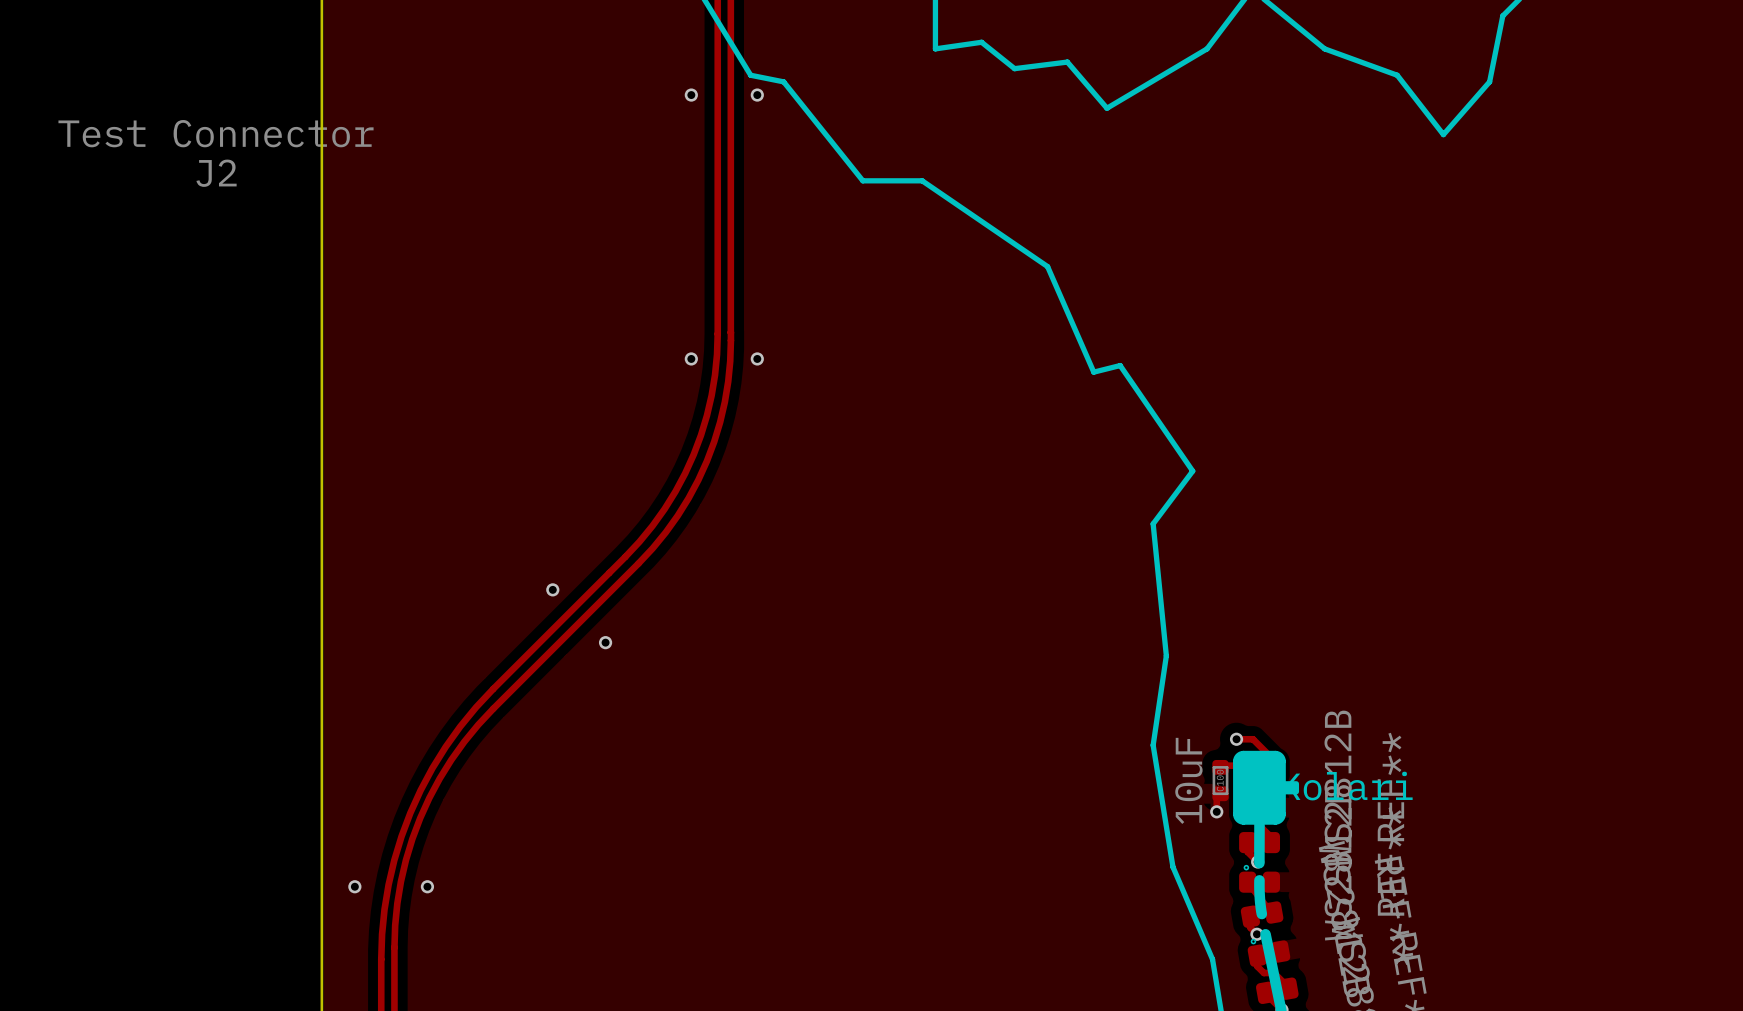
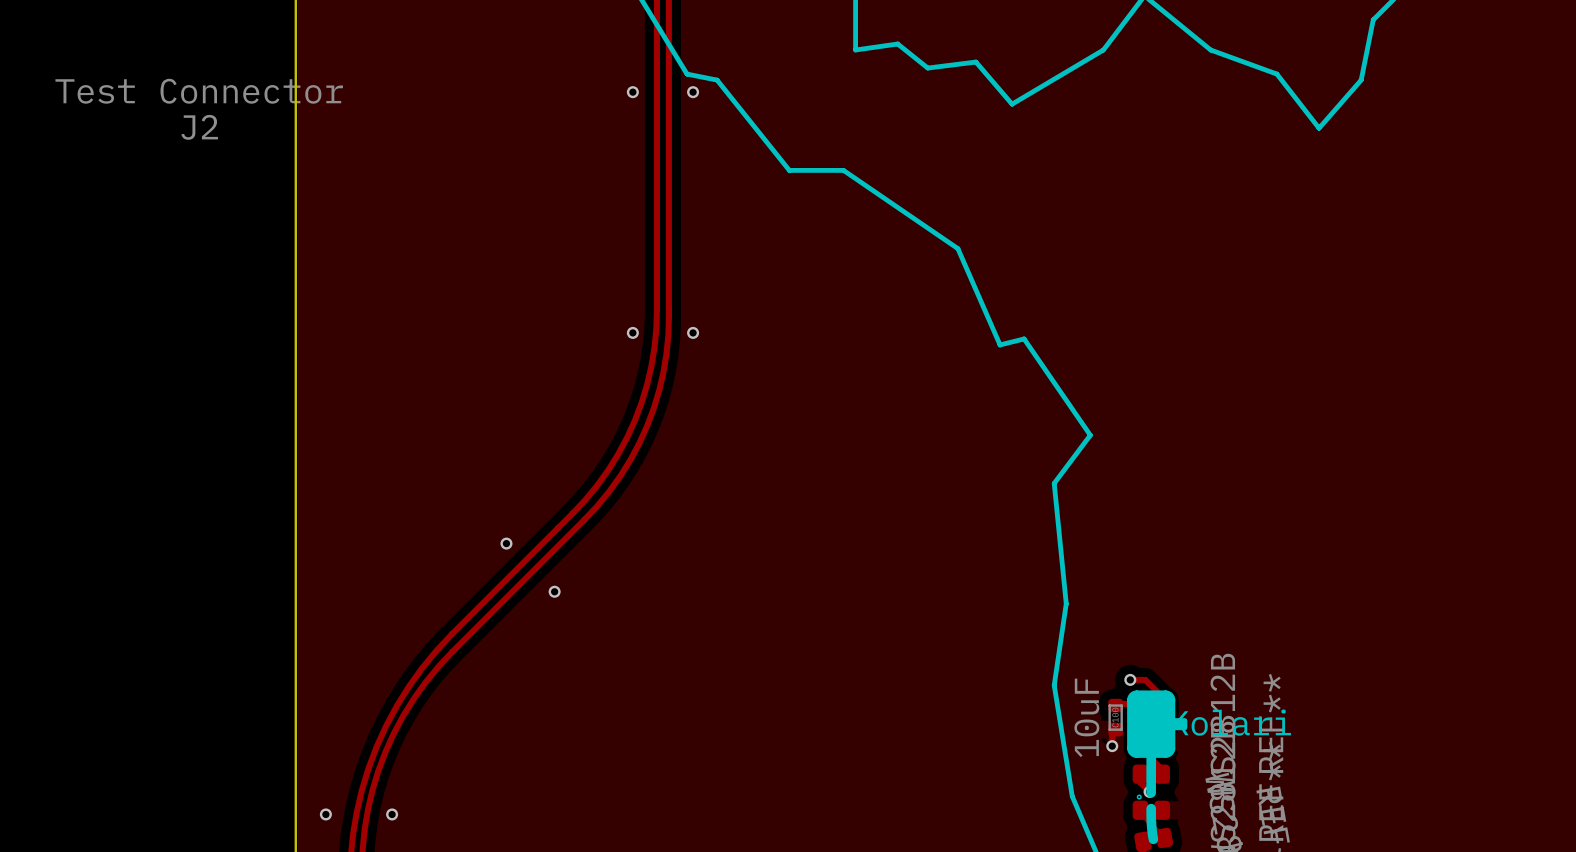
J2 position: (216, 153) -> (199, 109)

